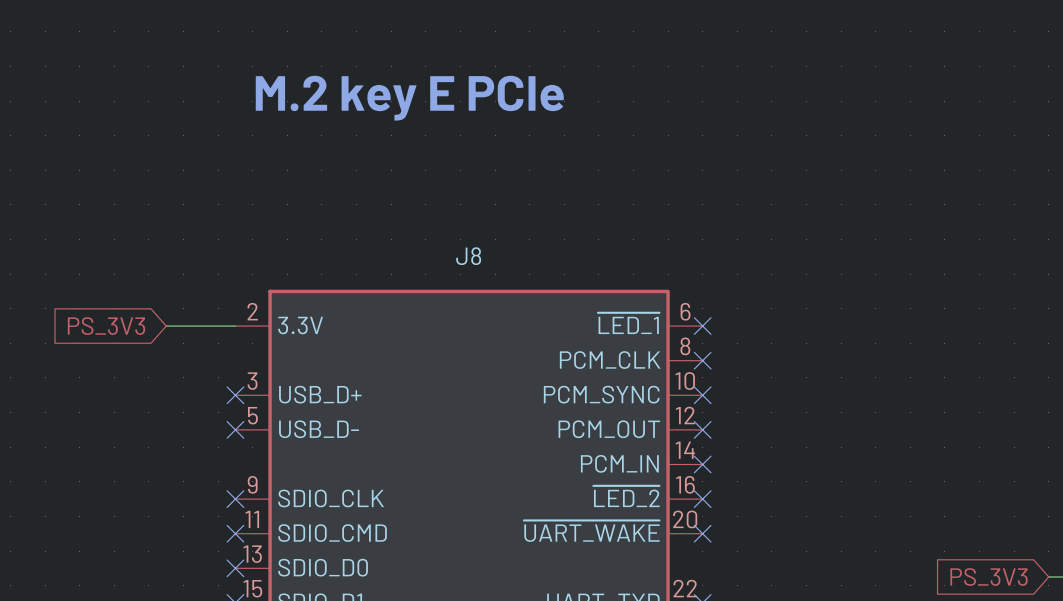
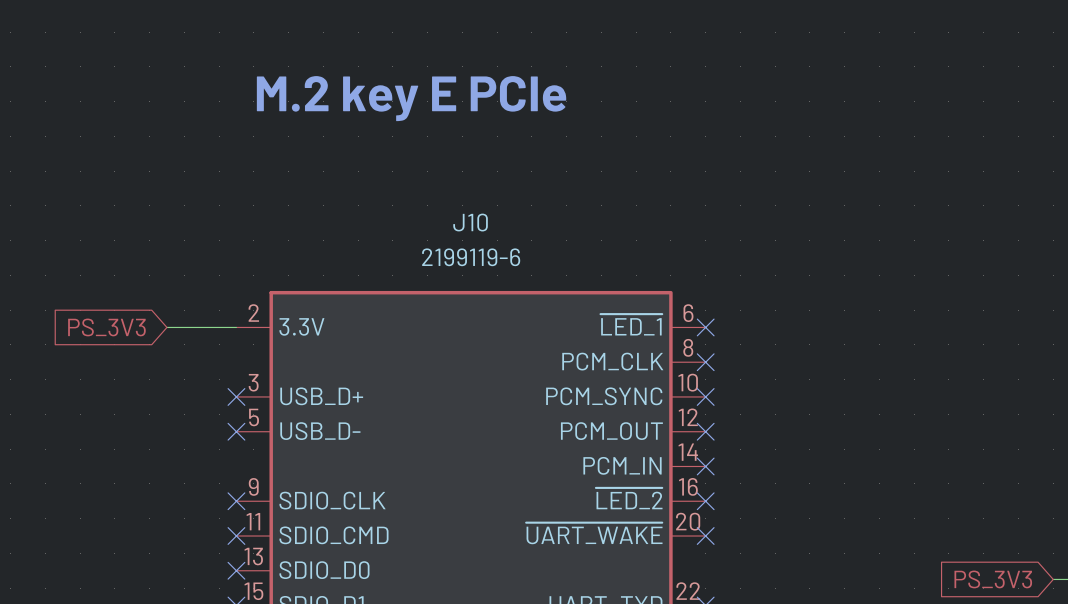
J8 name: J8 (468, 256) -> J10 (470, 222)
J8 text: none -> 2199119-6 (471, 257)

